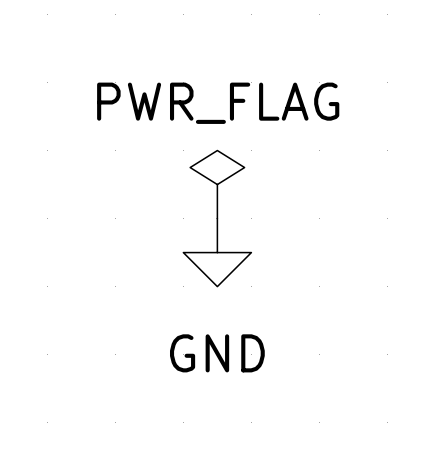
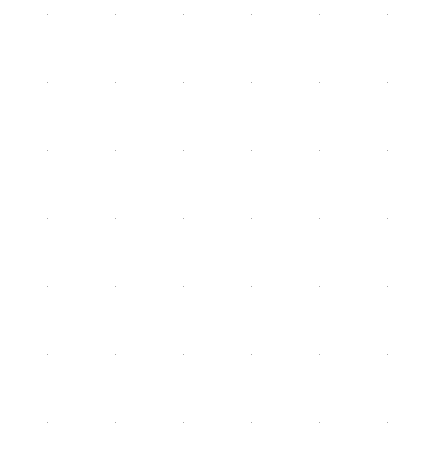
power symbol: PWR_FLAG (217, 184) -> none
power symbol: GND (217, 252) -> none

